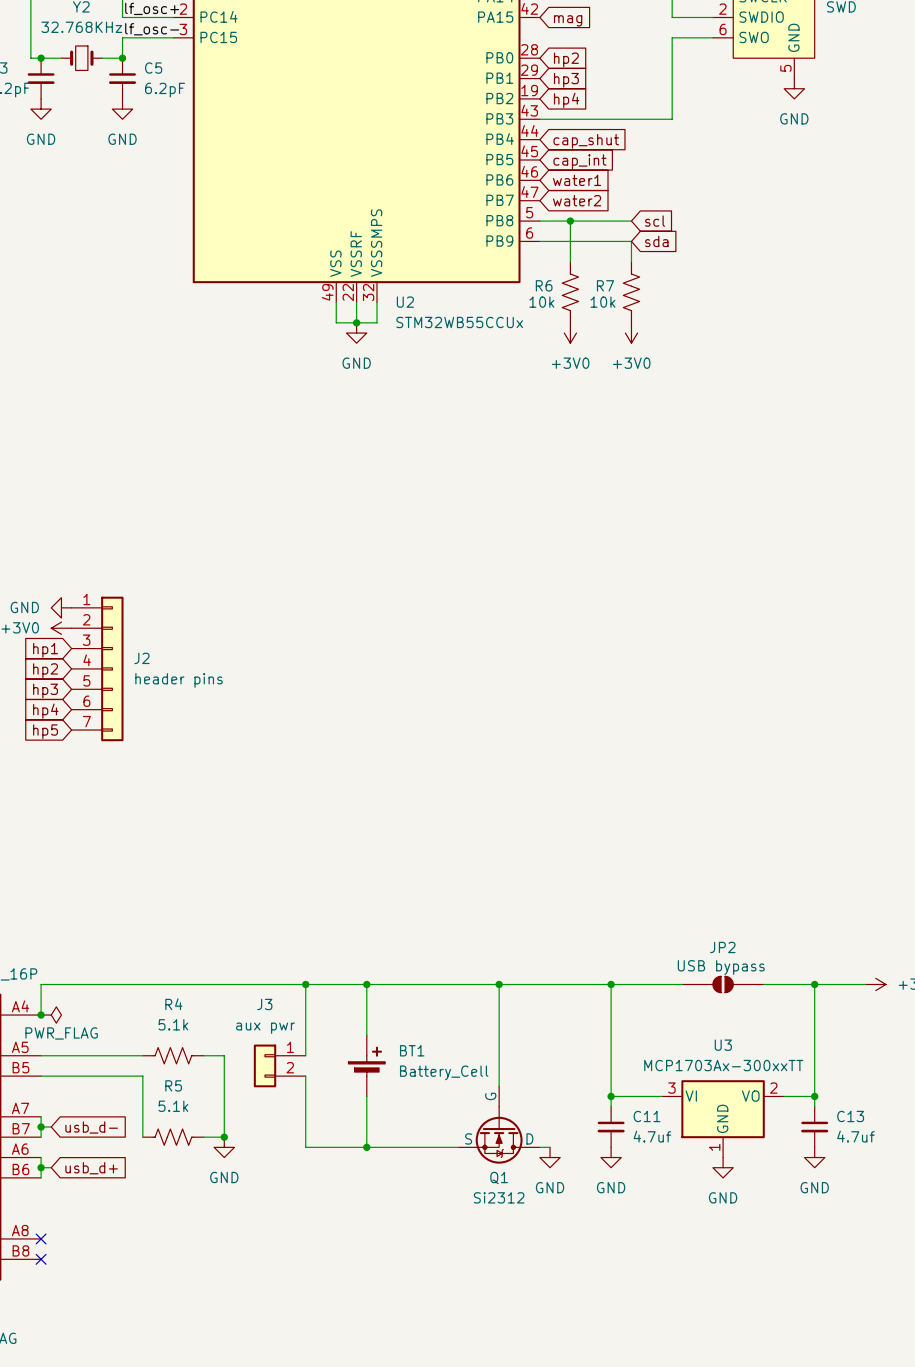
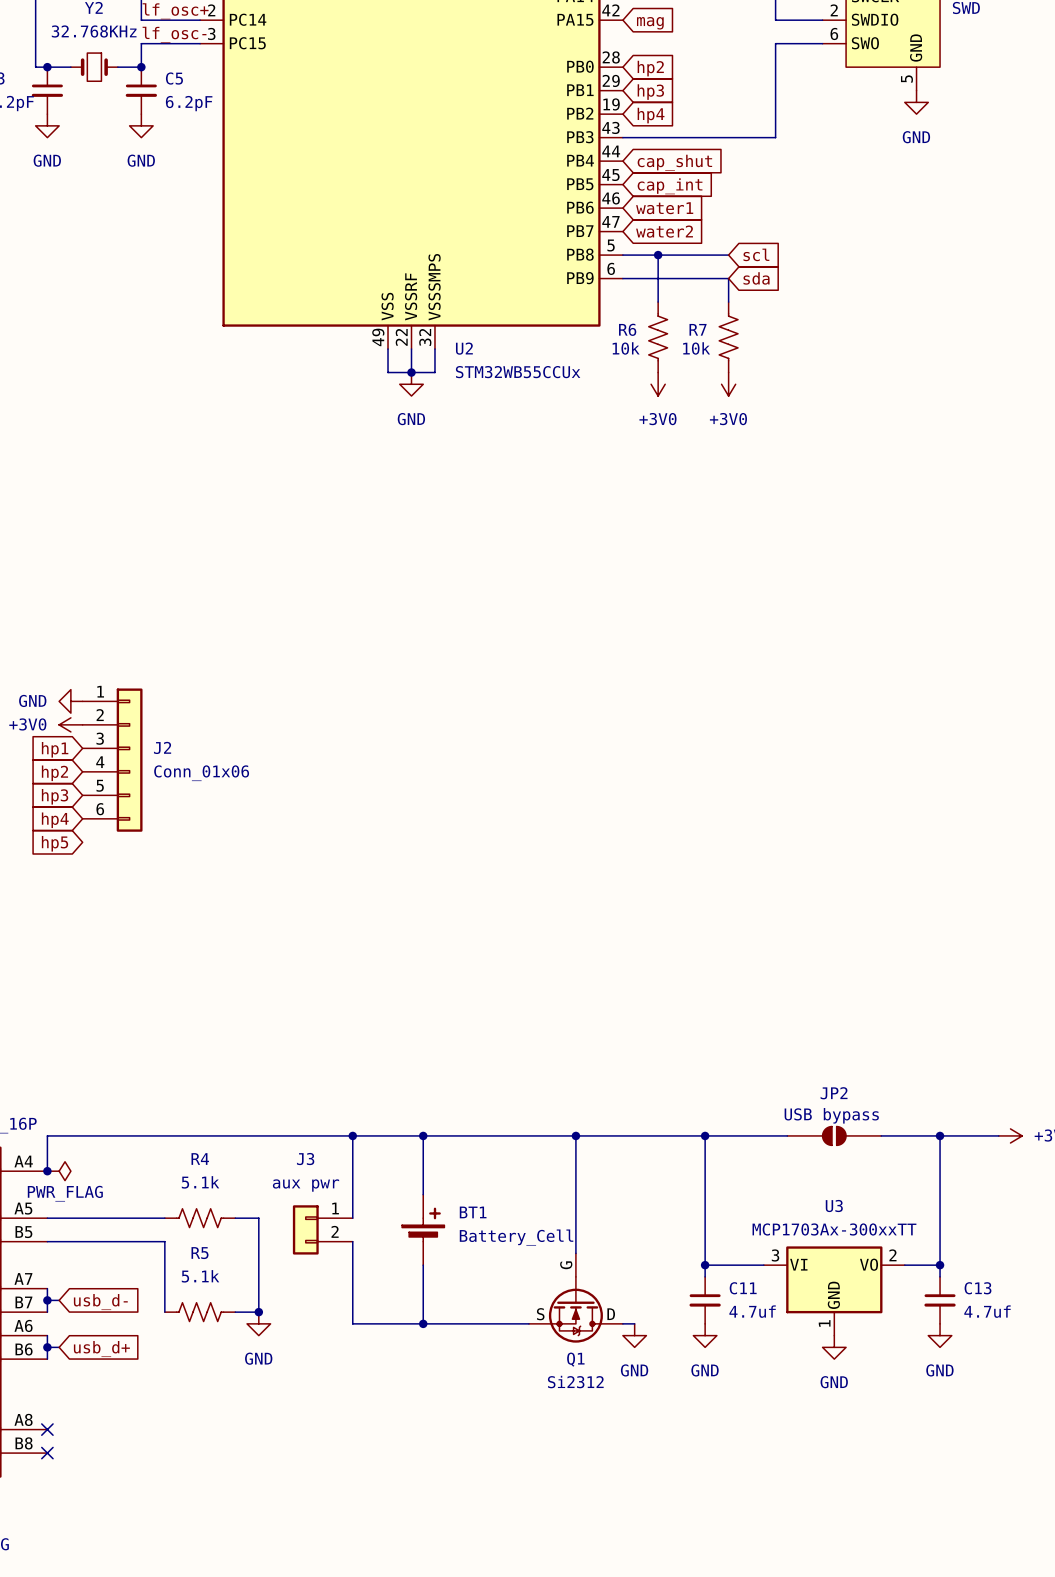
J2 symbol: [71, 596, 124, 742] -> [82, 688, 143, 832]
J2 value: header pins (179, 680) -> Conn_01x06 (201, 773)

